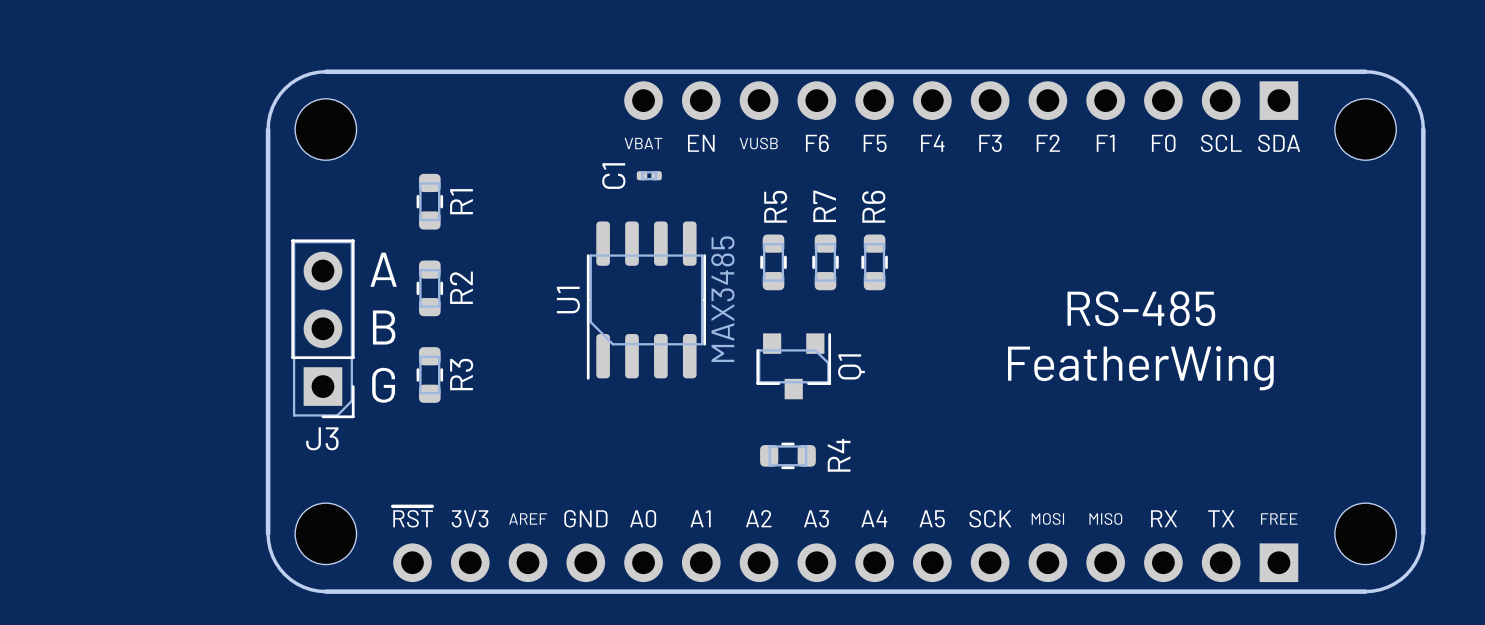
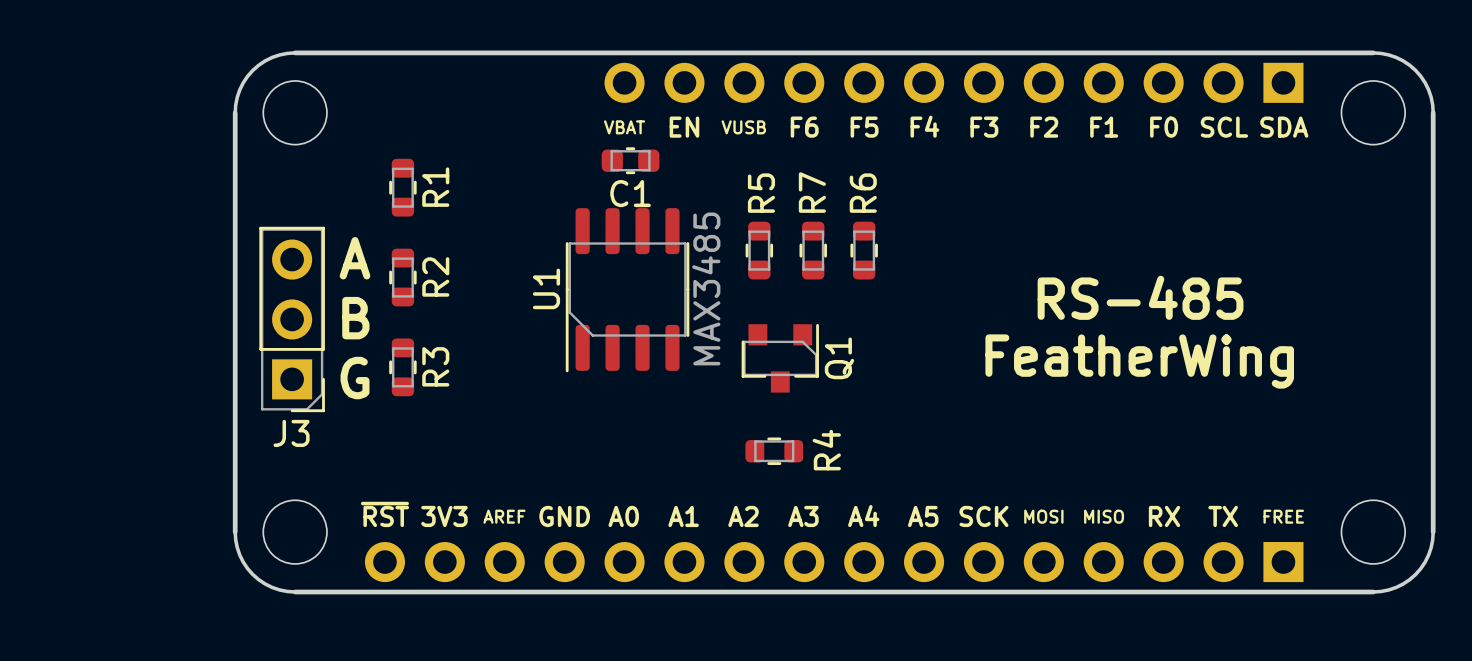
C1 footprint: [636, 171, 662, 181] -> [601, 147, 660, 175]
C1 name position: C1 (613, 176) -> C1 (630, 193)

